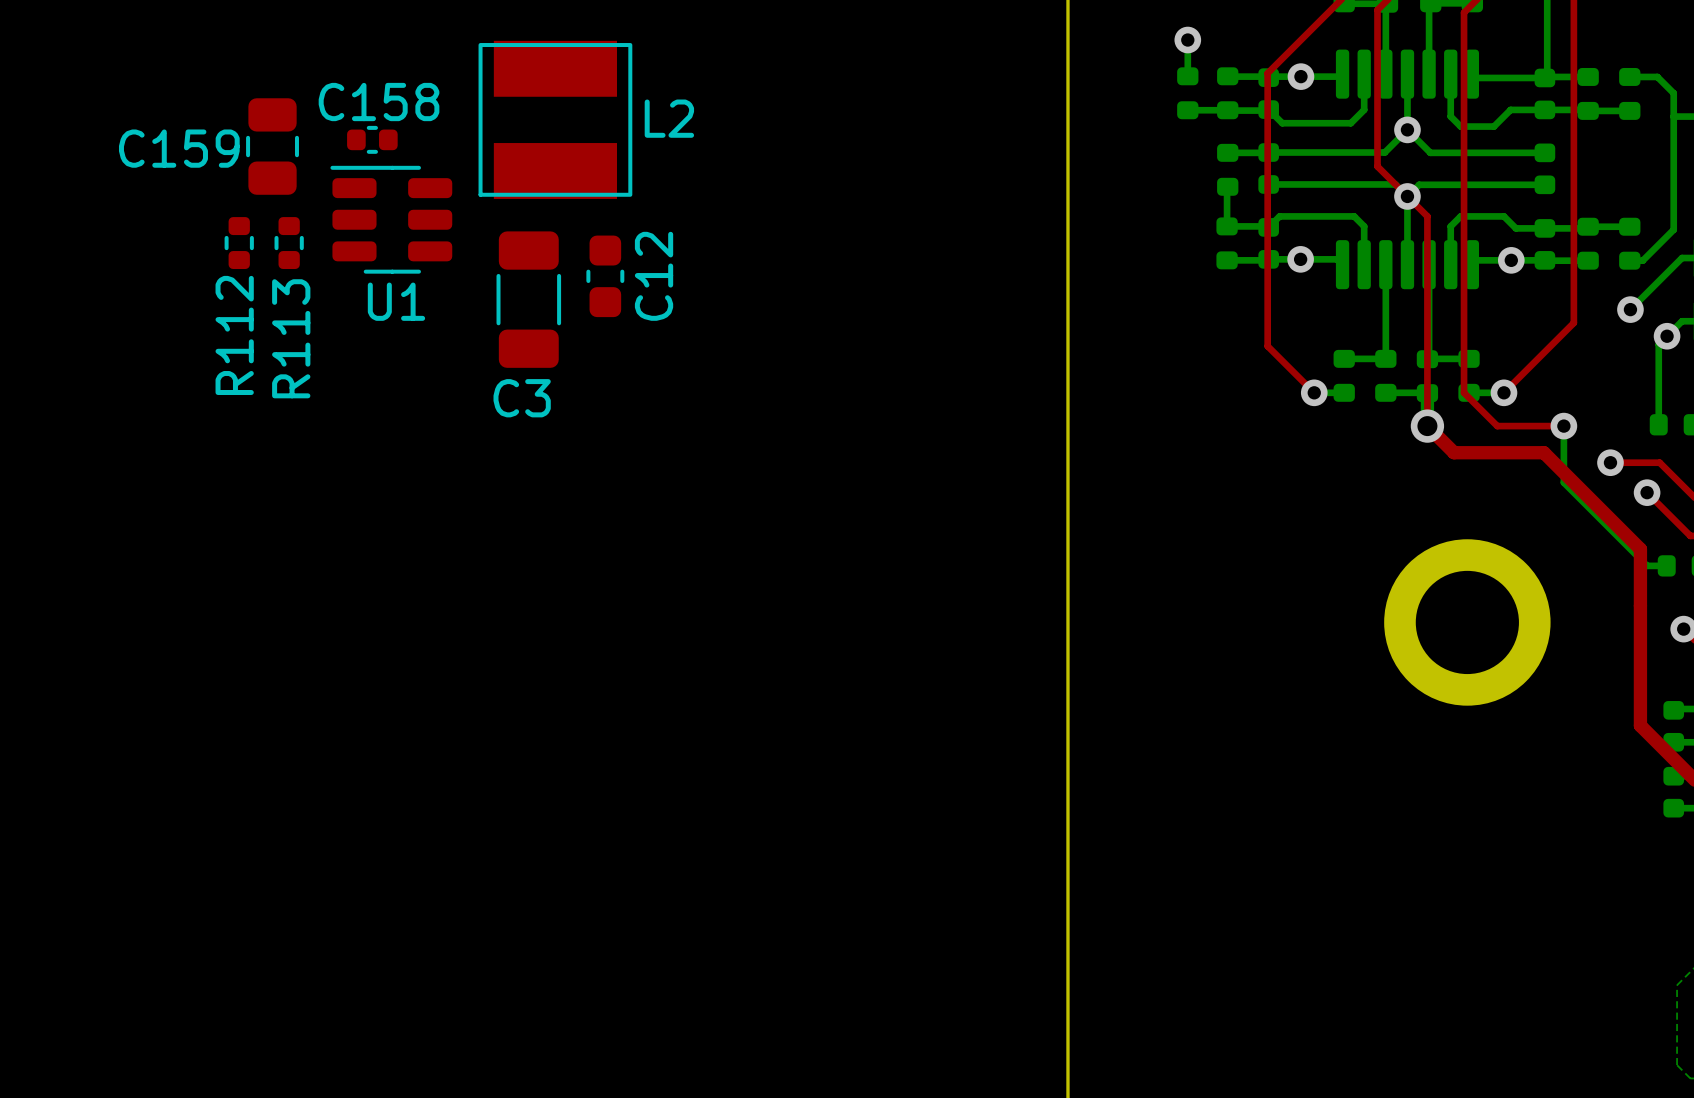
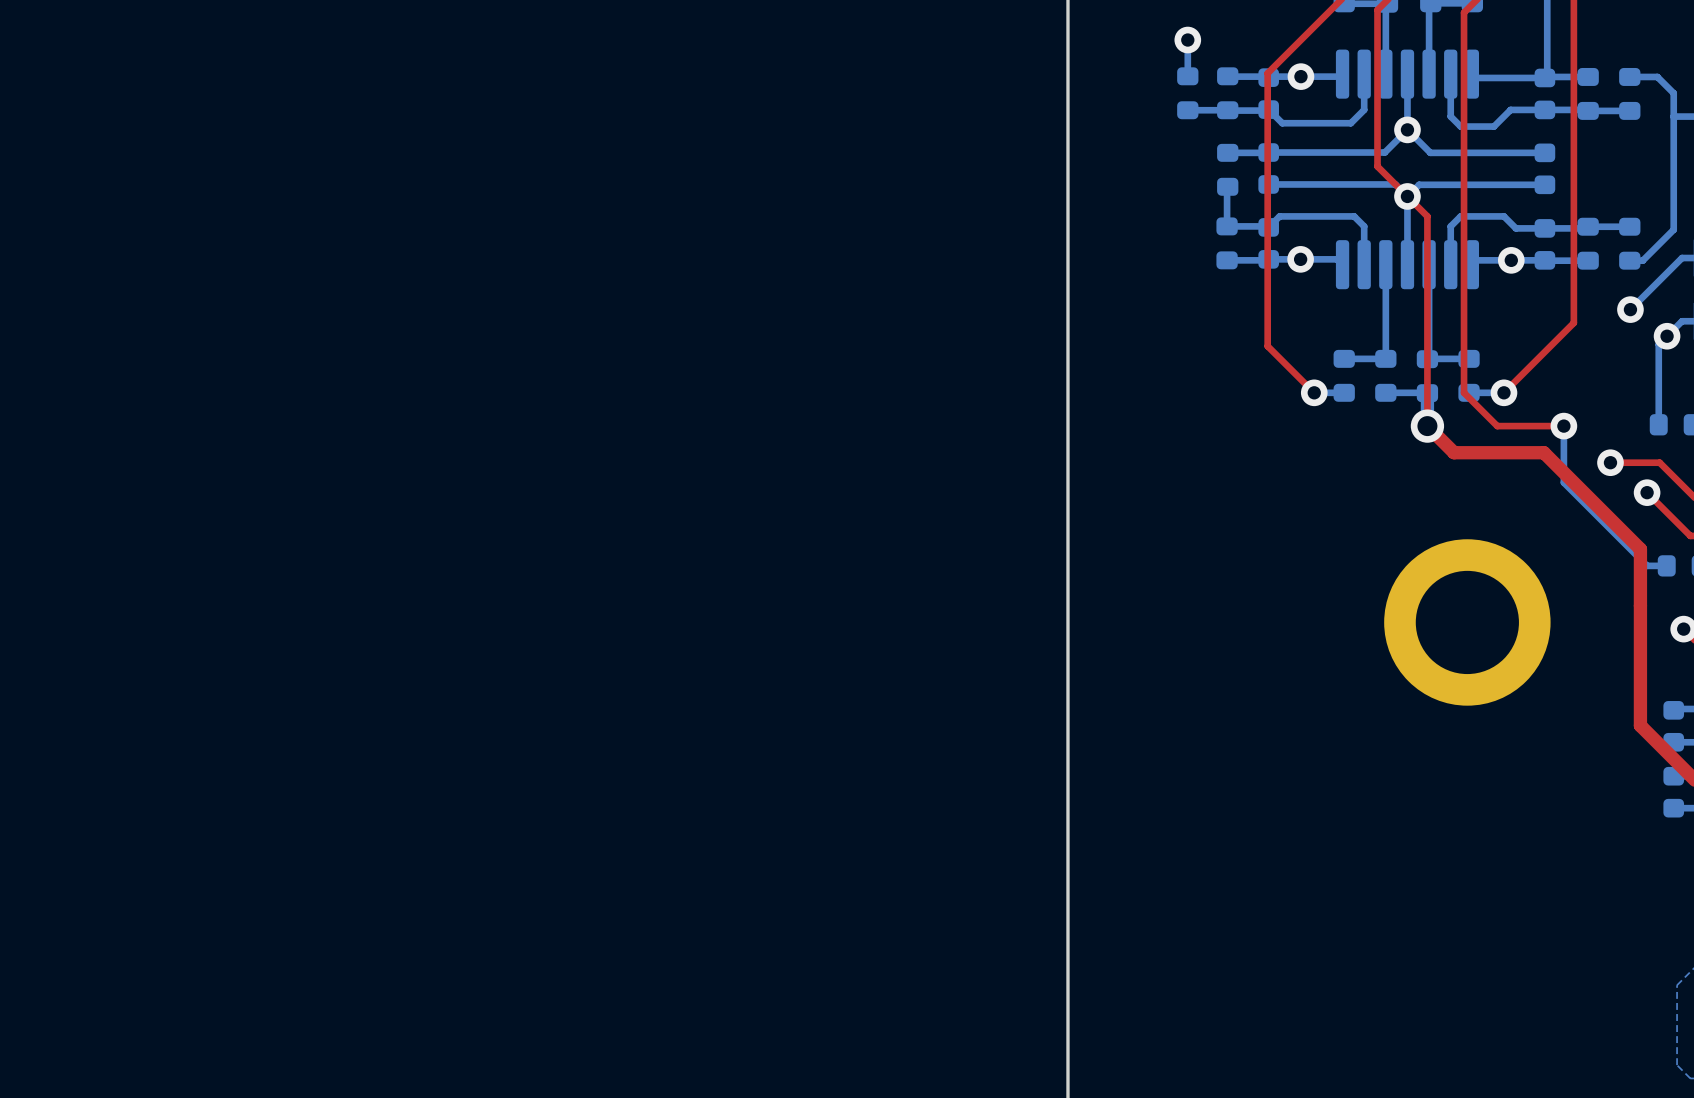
L2: (555, 119) -> none
C158: (372, 139) -> none
C159: (272, 146) -> none
U1: (391, 219) -> none
R112: (239, 243) -> none
R113: (289, 243) -> none
C12: (605, 276) -> none
C3: (528, 299) -> none

